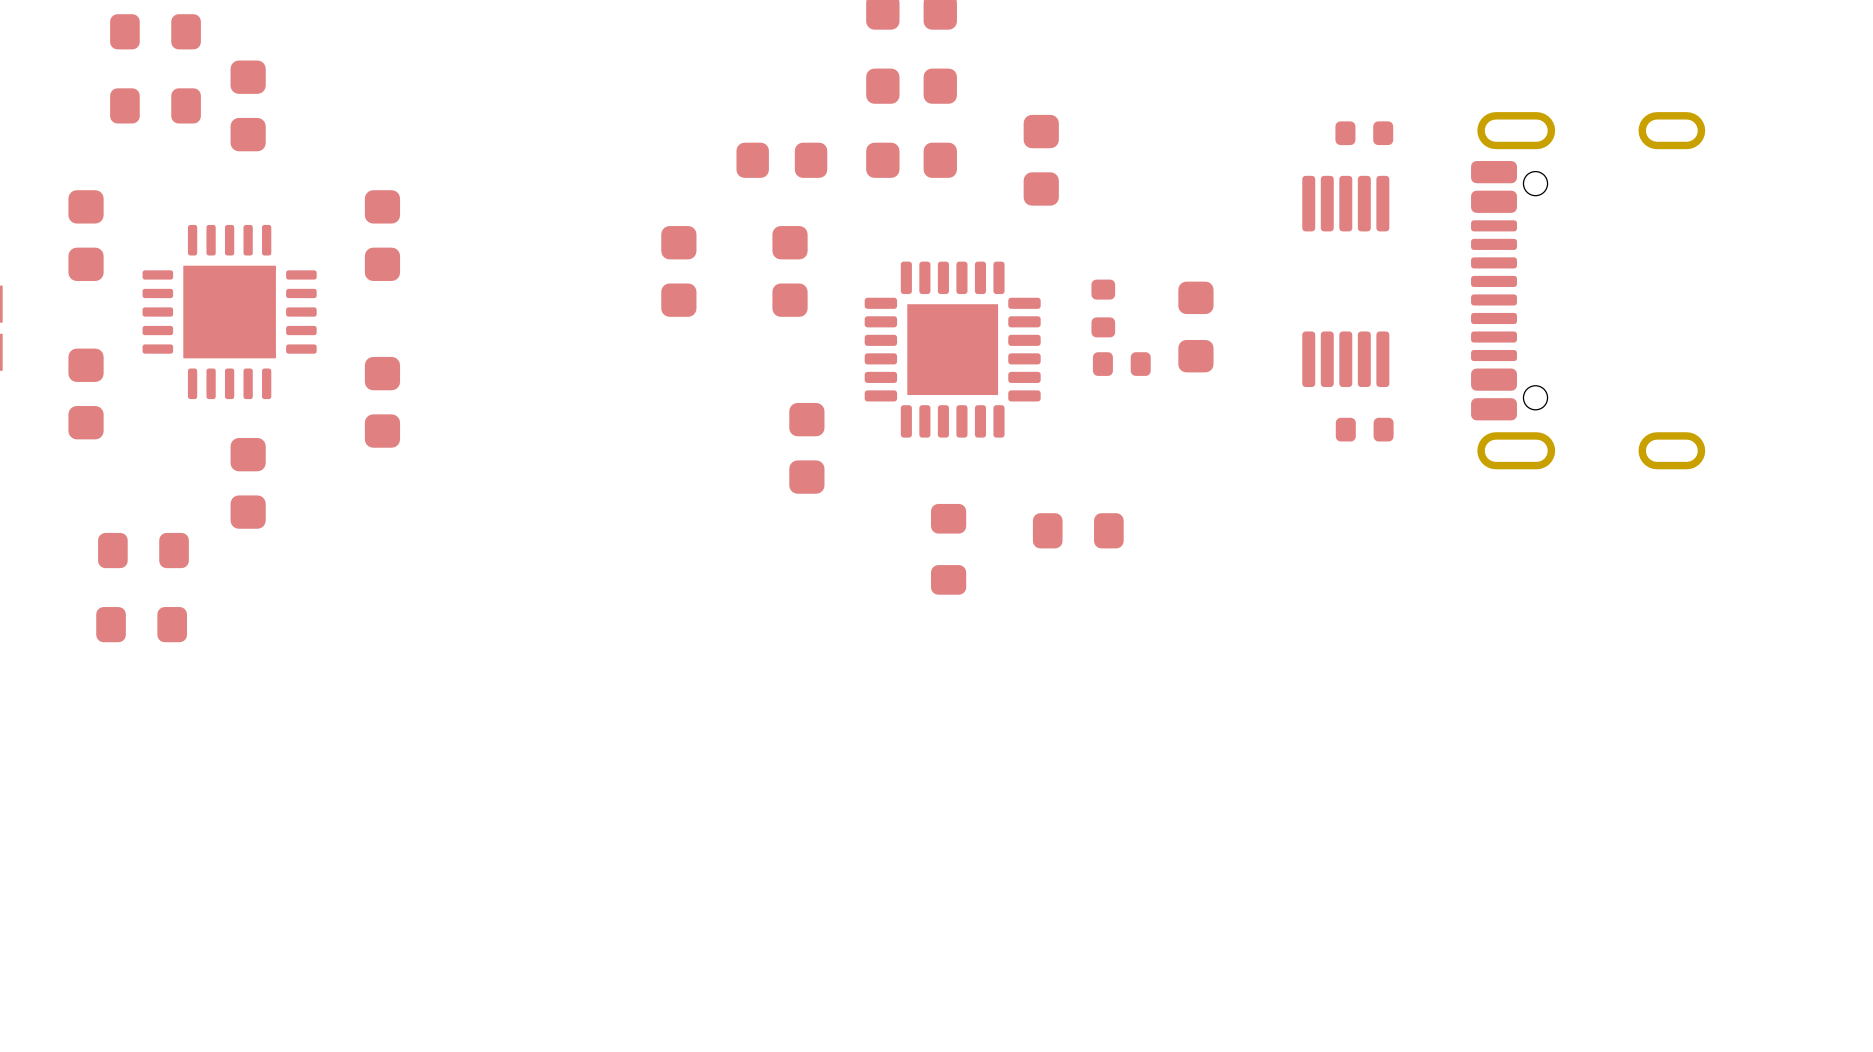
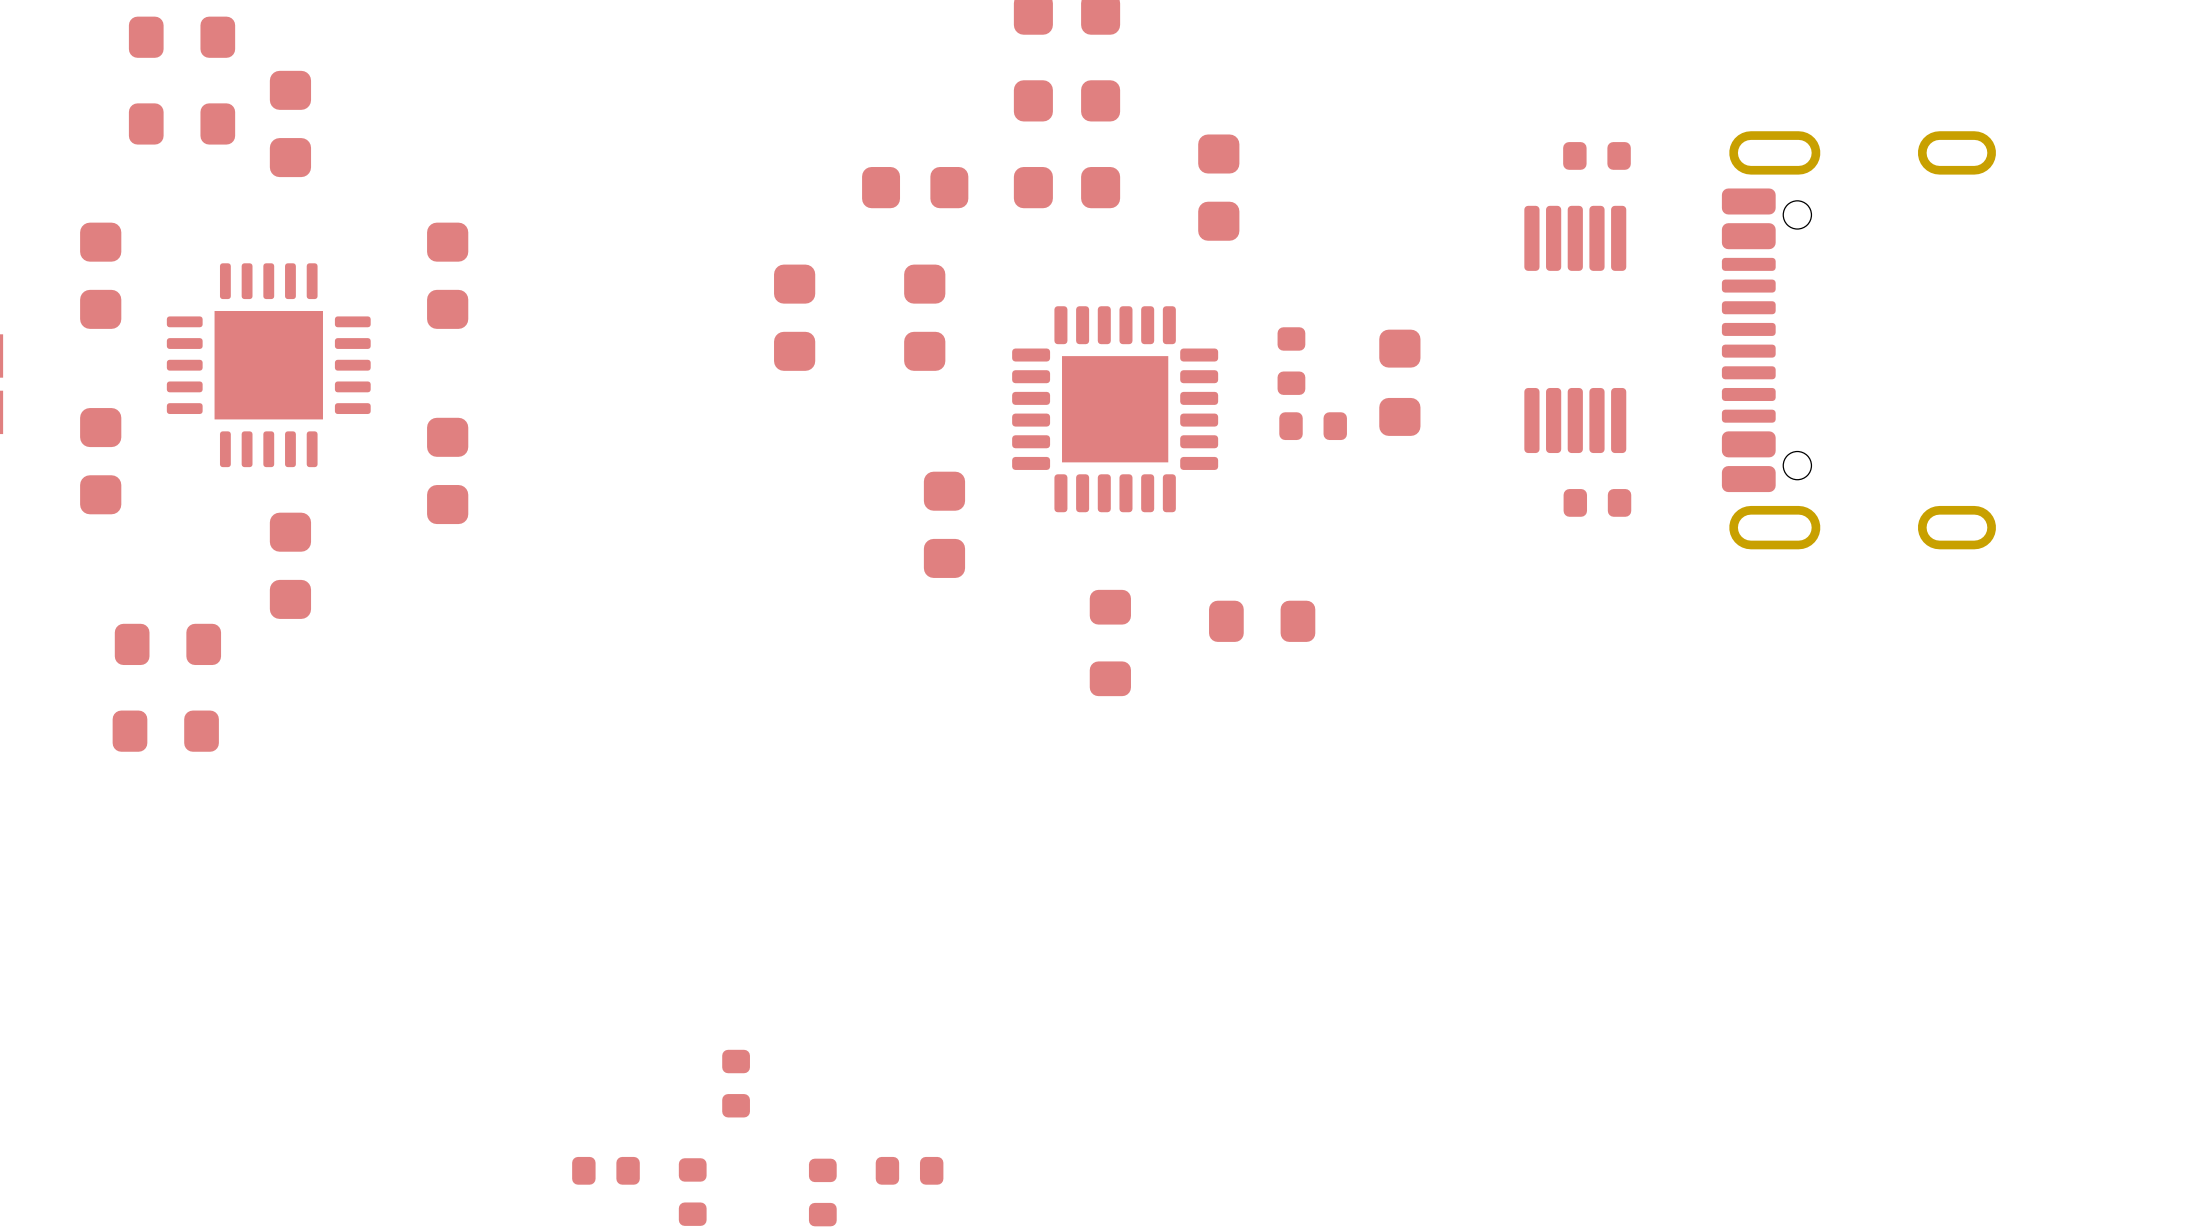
part: none -> (736, 1083)
part: none -> (605, 1170)
part: none -> (909, 1170)
part: none -> (692, 1192)
part: none -> (822, 1192)

